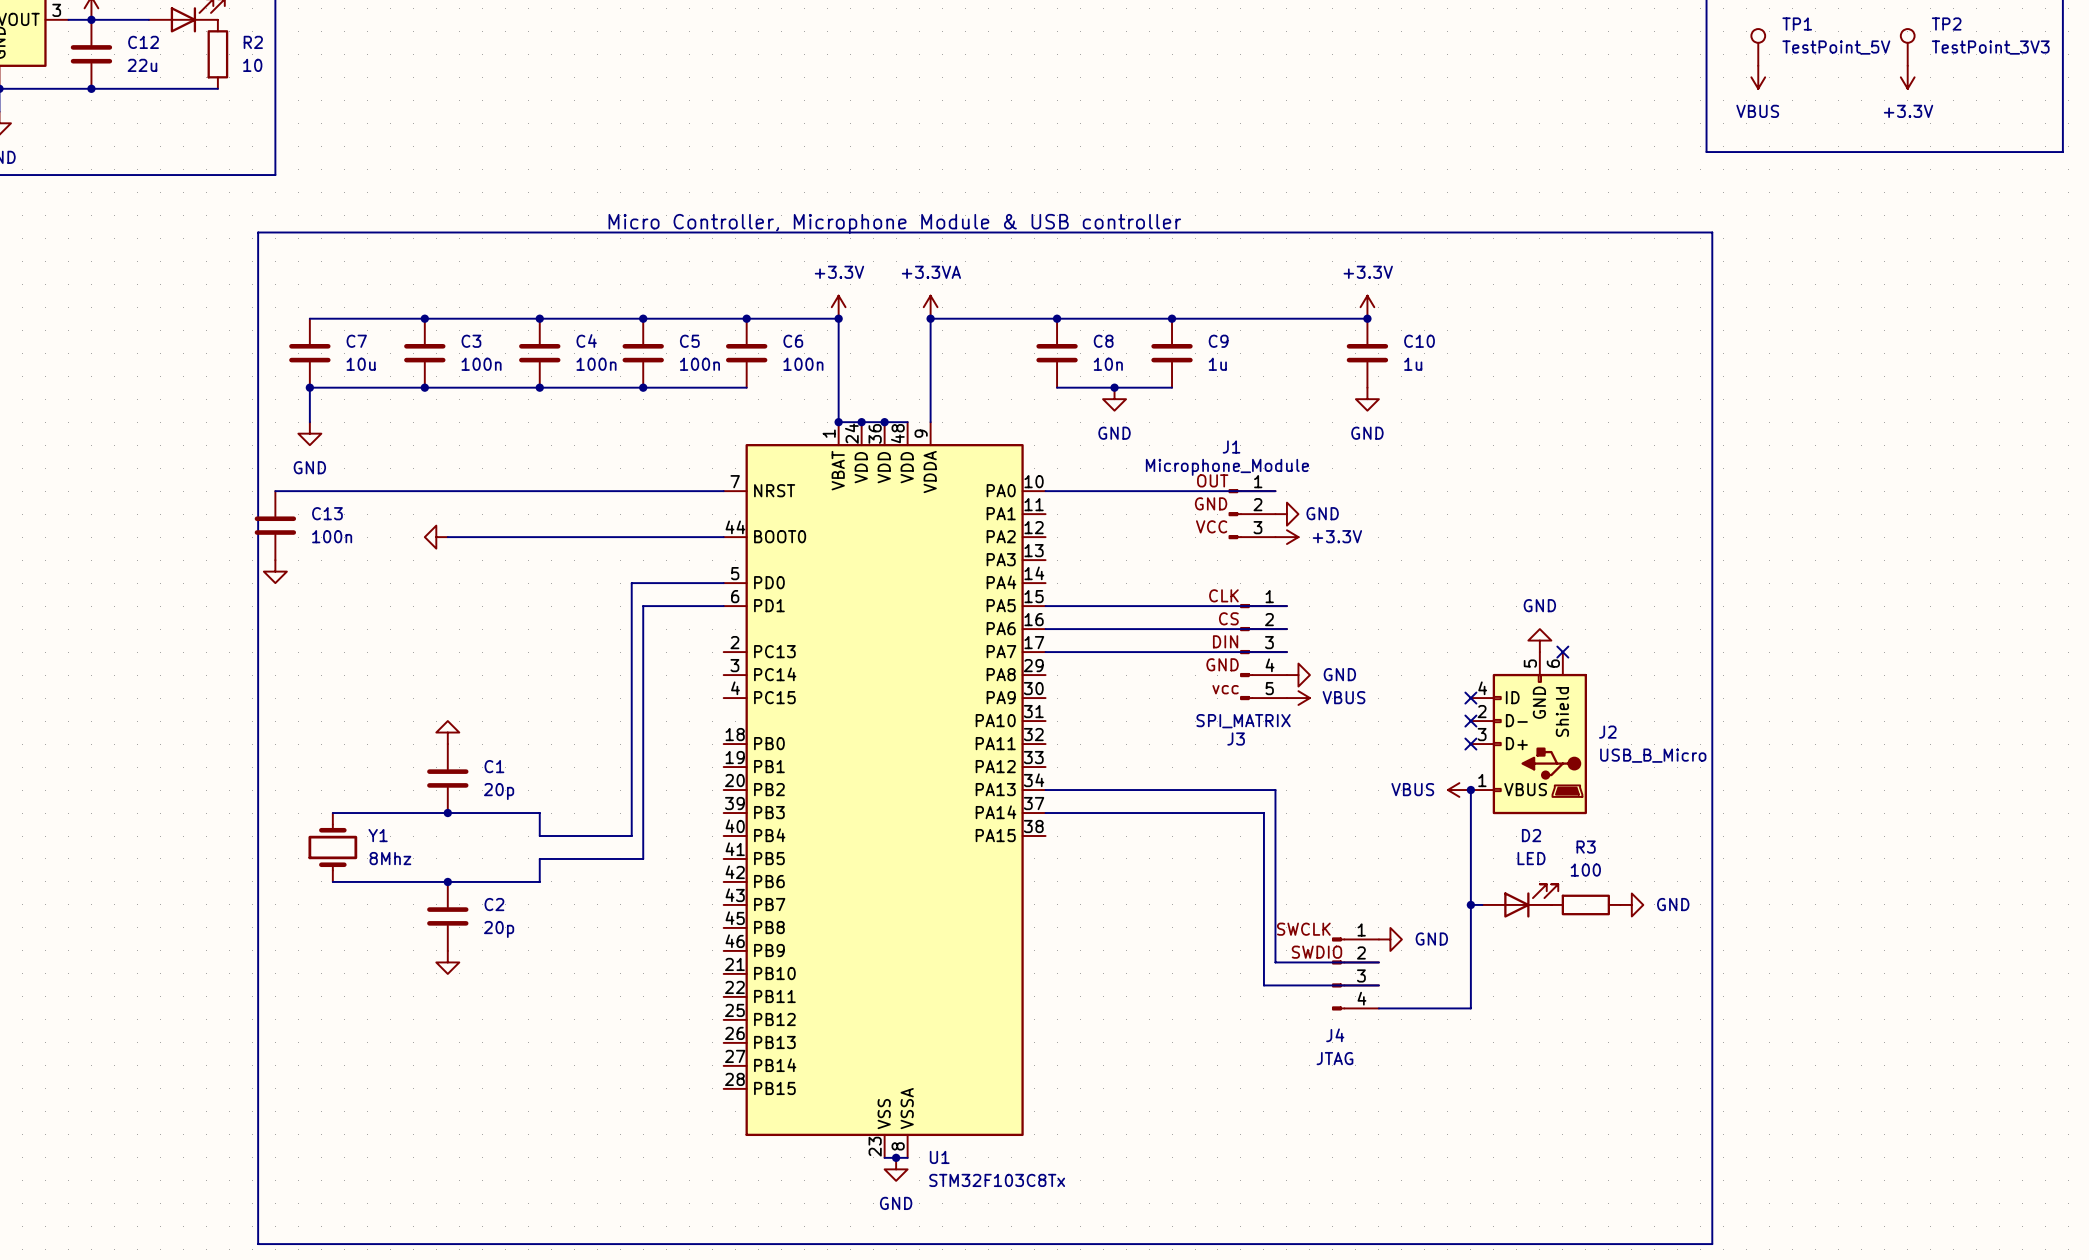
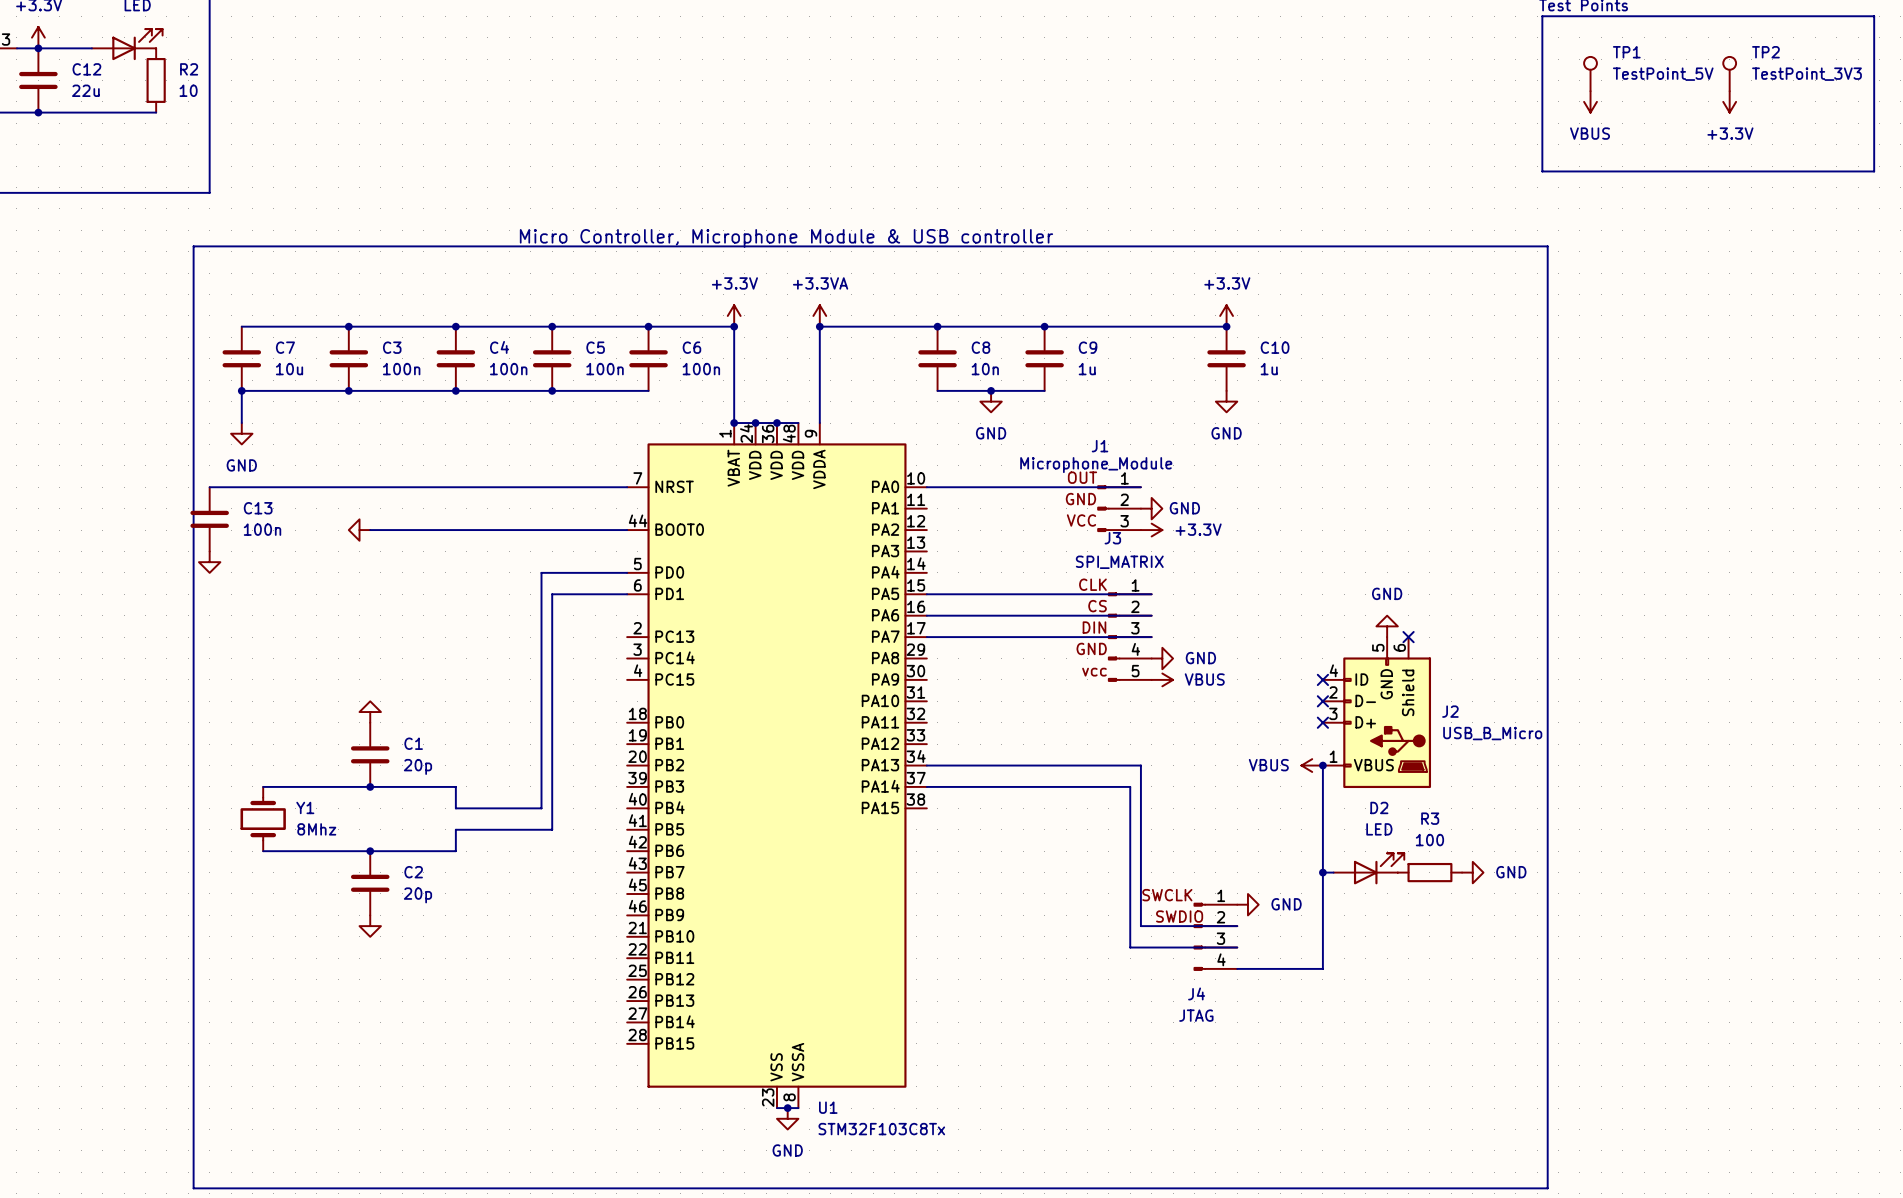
J3 value position: SPI_MATRIX (1243, 721) -> SPI_MATRIX (1119, 562)
J3 name position: J3 (1236, 739) -> J3 (1112, 538)

